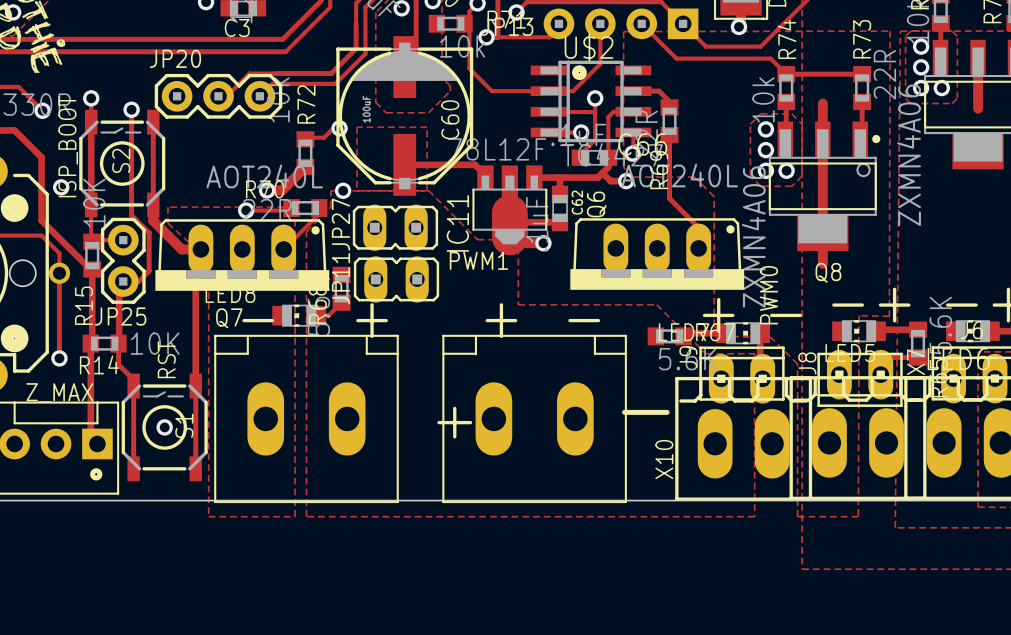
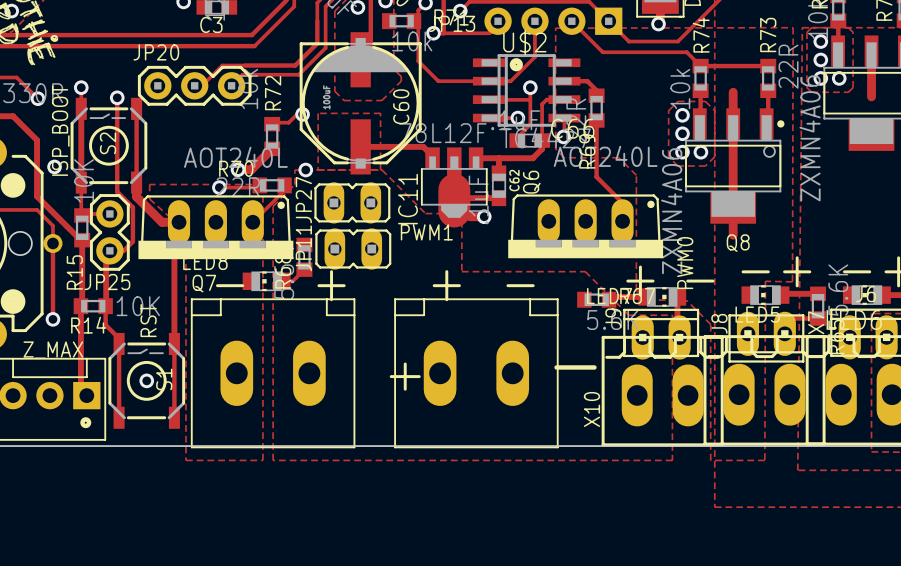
track: (602, 173) (610, 181) (626, 181) -> none
via: (626, 181) -> none

